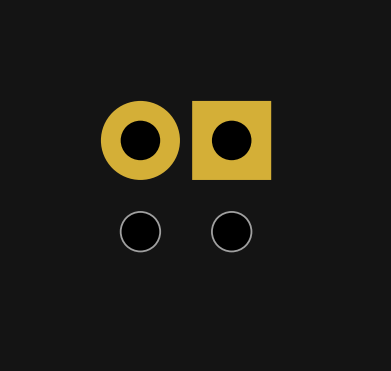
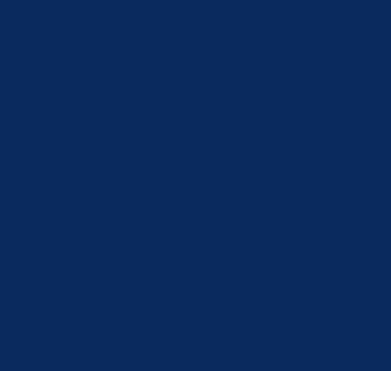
part: (186, 176) -> none

